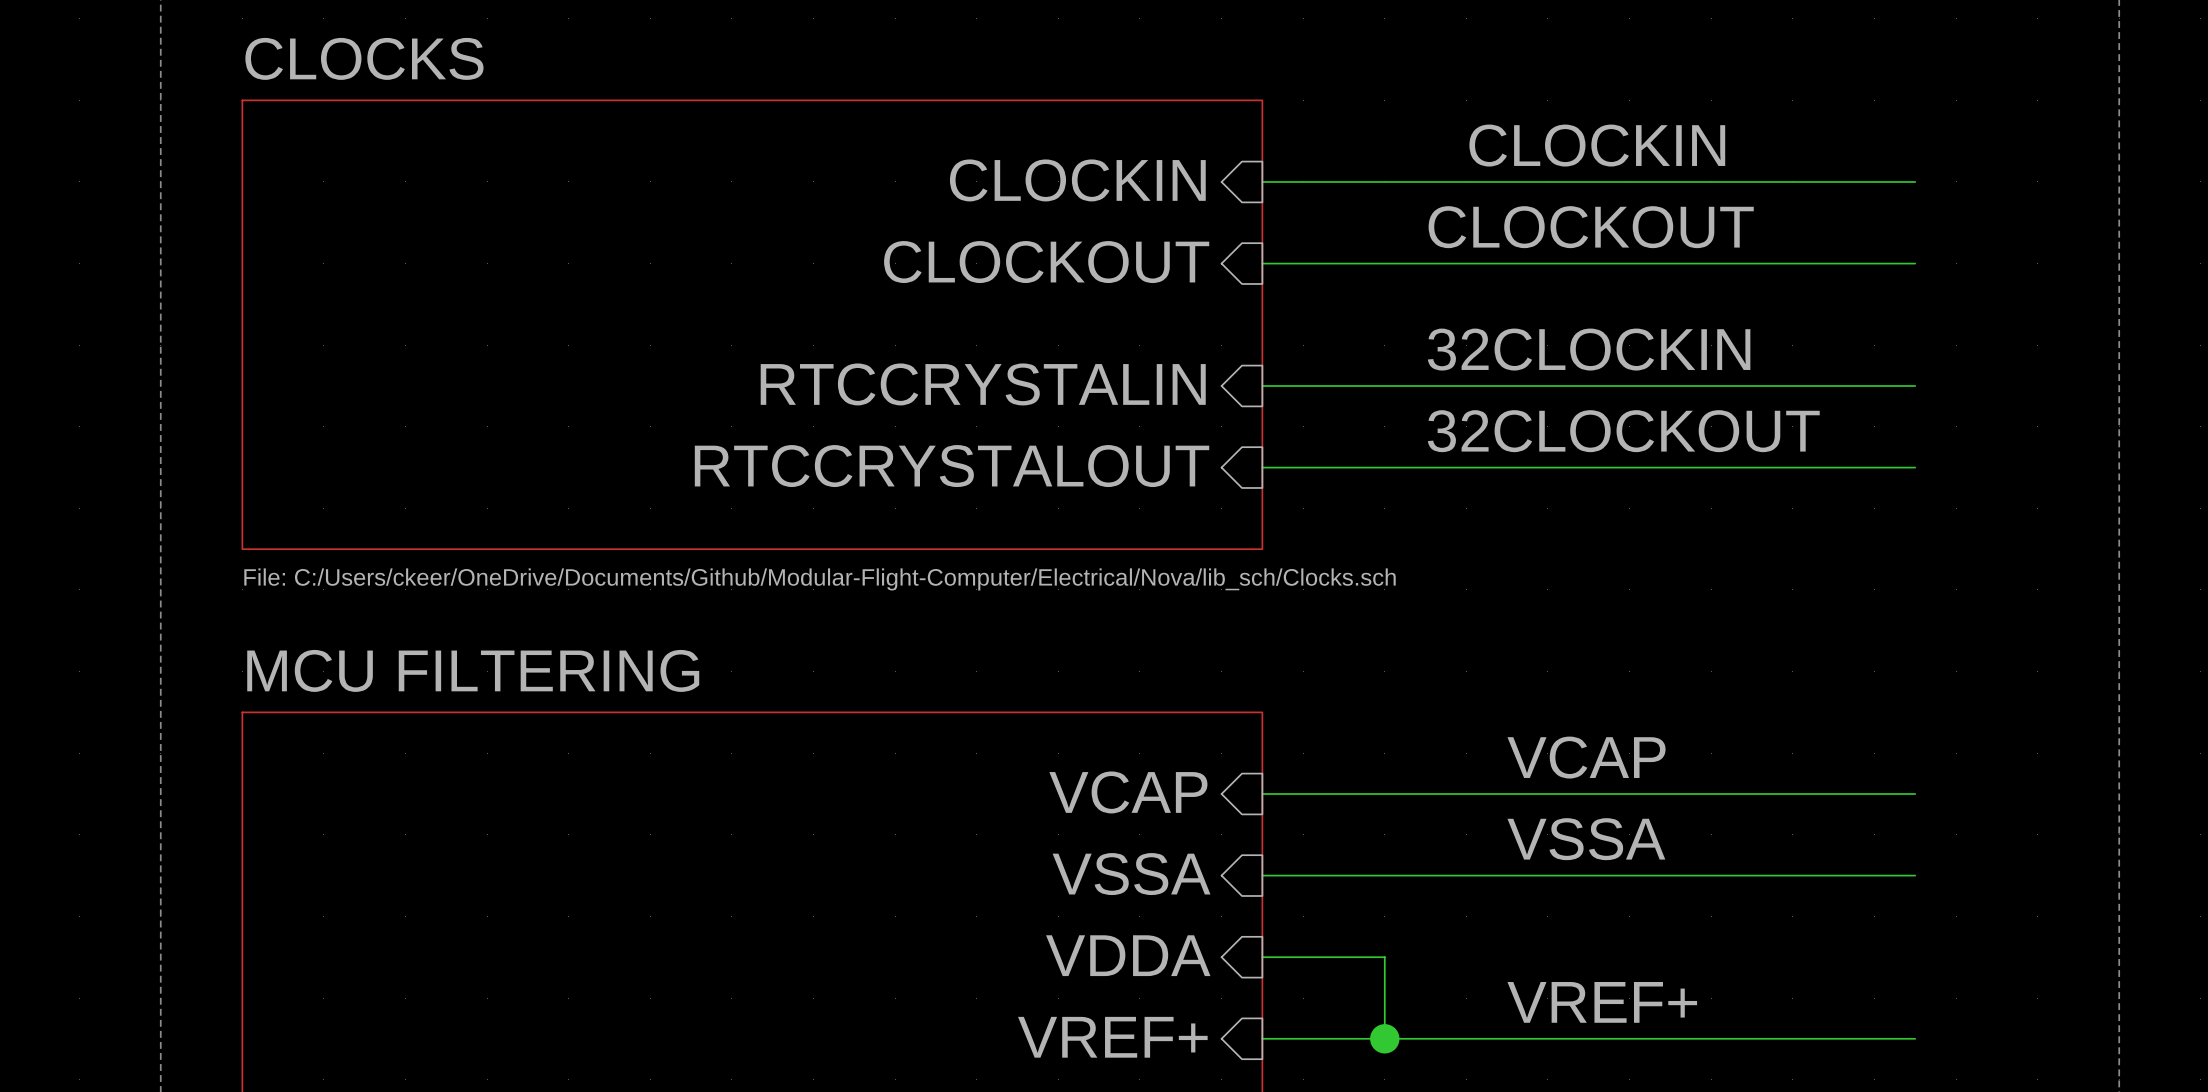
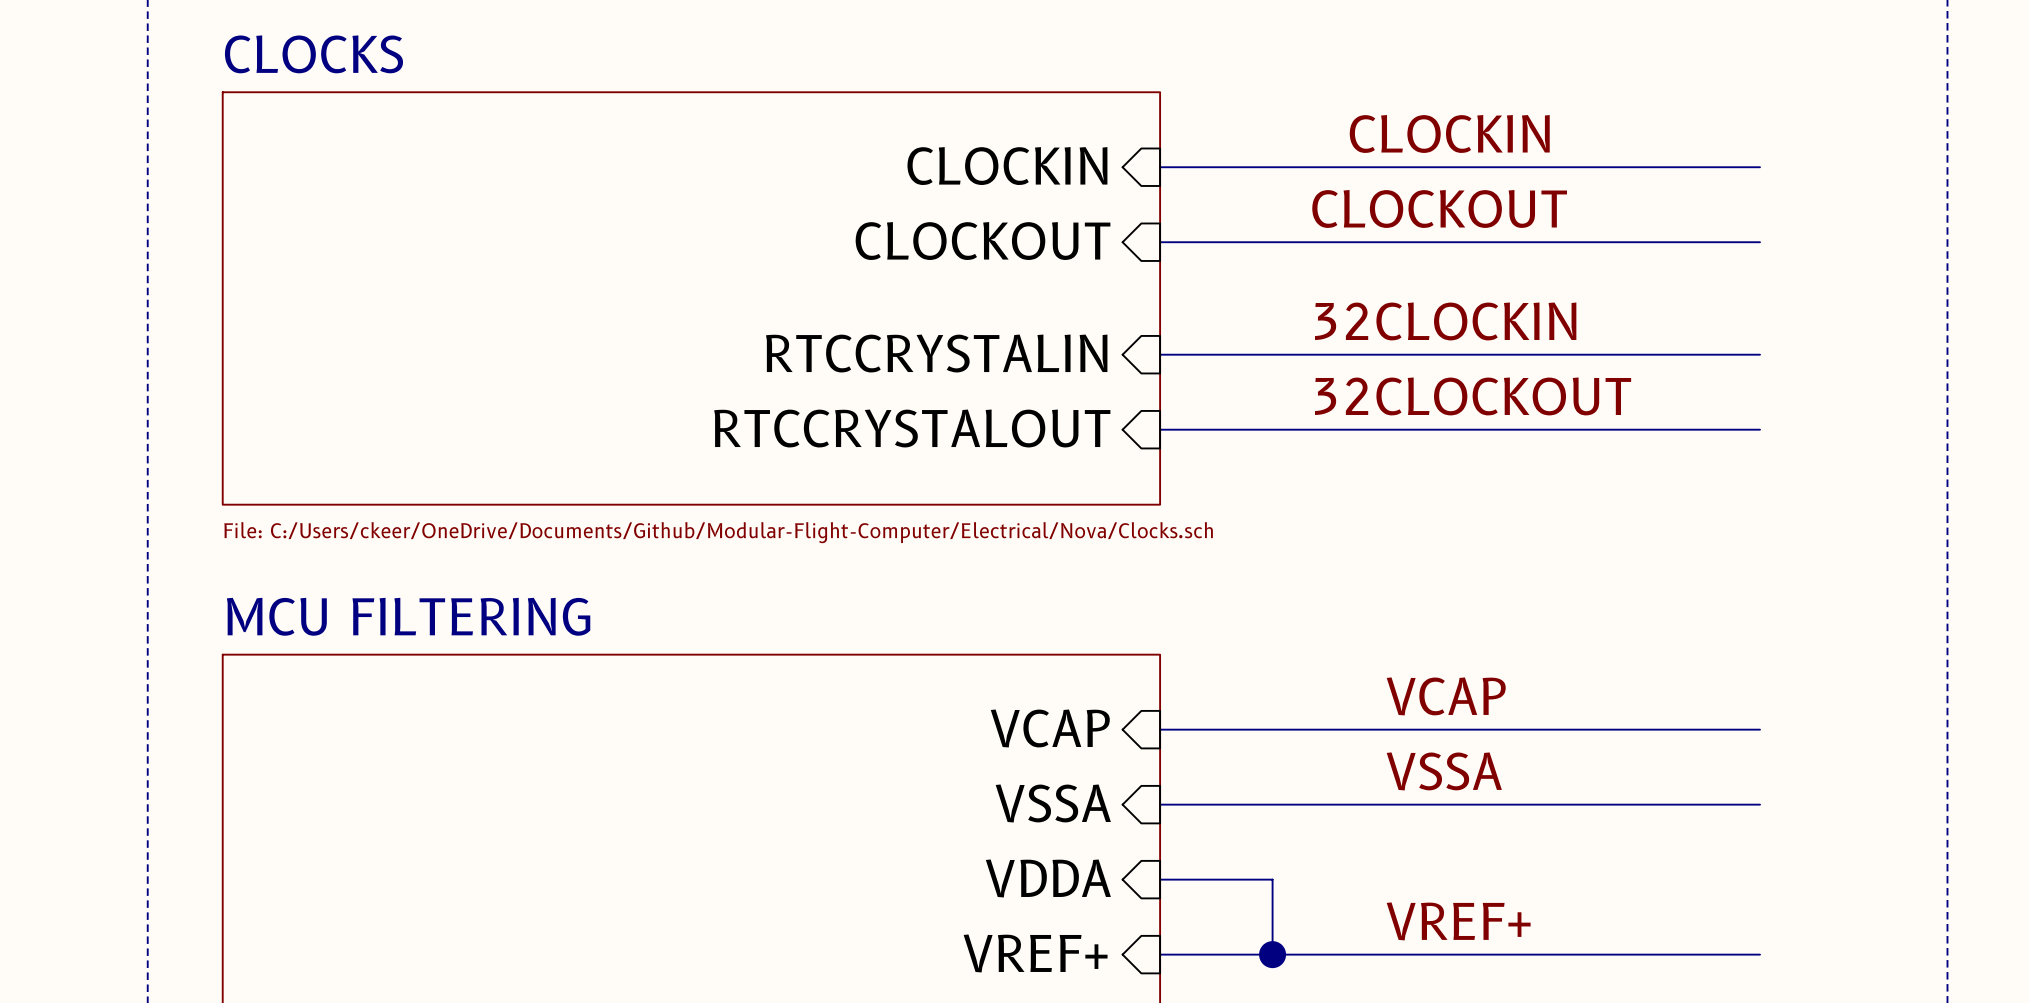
sheet CLOCKS value: File: C:/Users/ckeer/OneDrive/Documents/Github/Modular-Flight-Computer/Electrical/Nova/lib_sch/Clocks.sch (820, 579) -> File: C:/Users/ckeer/OneDrive/Documents/Github/Modular-Flight-Computer/Electrical/Nova/Clocks.sch (718, 532)

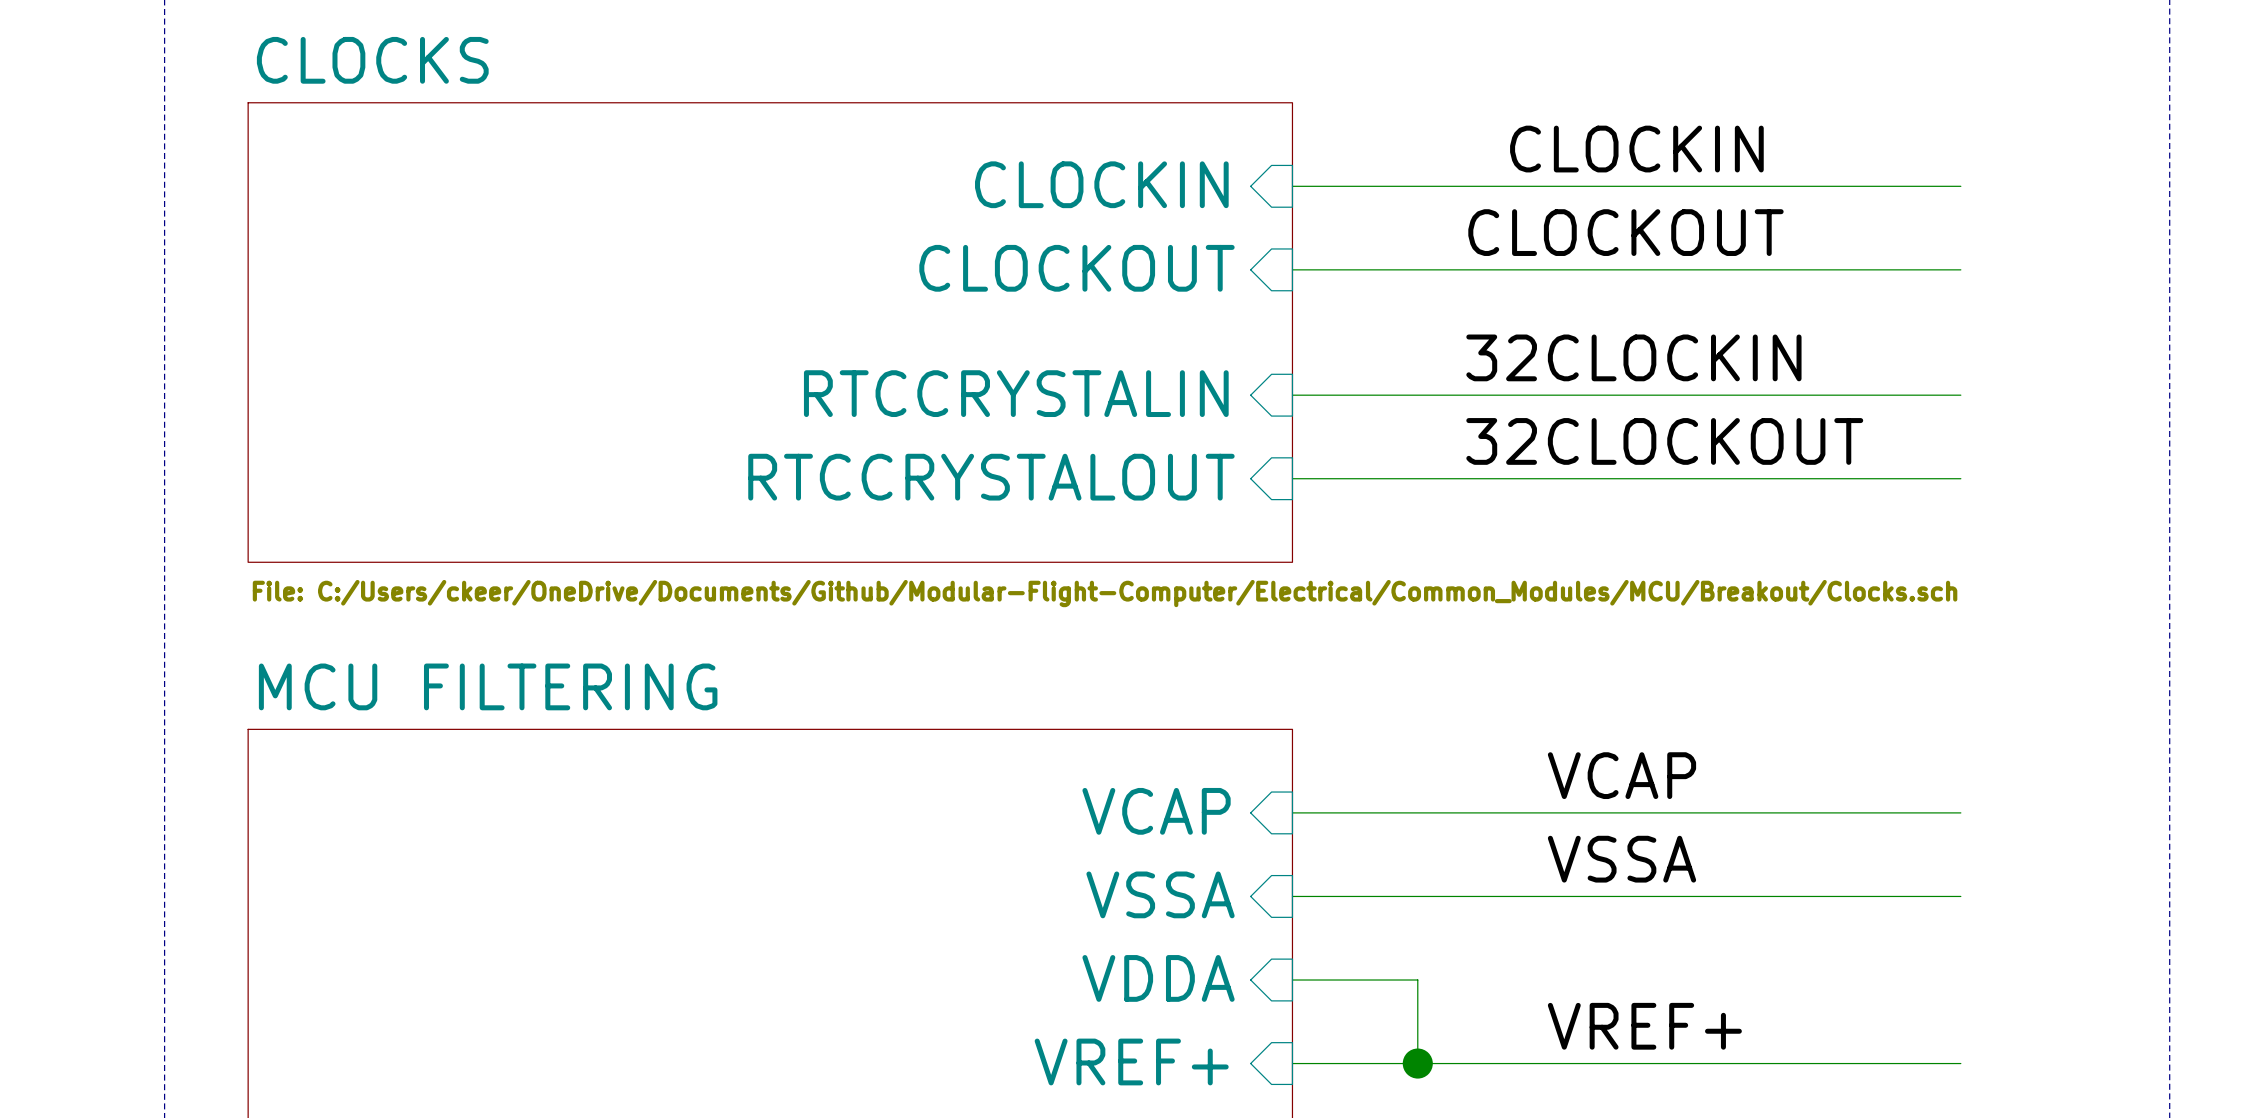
sheet CLOCKS value: File: C:/Users/ckeer/OneDrive/Documents/Github/Modular-Flight-Computer/Electrical/Nova/Clocks.sch (718, 532) -> File: C:/Users/ckeer/OneDrive/Documents/Github/Modular-Flight-Computer/Electrical/Common_Modules/MCU/Breakout/Clocks.sch (1105, 593)

